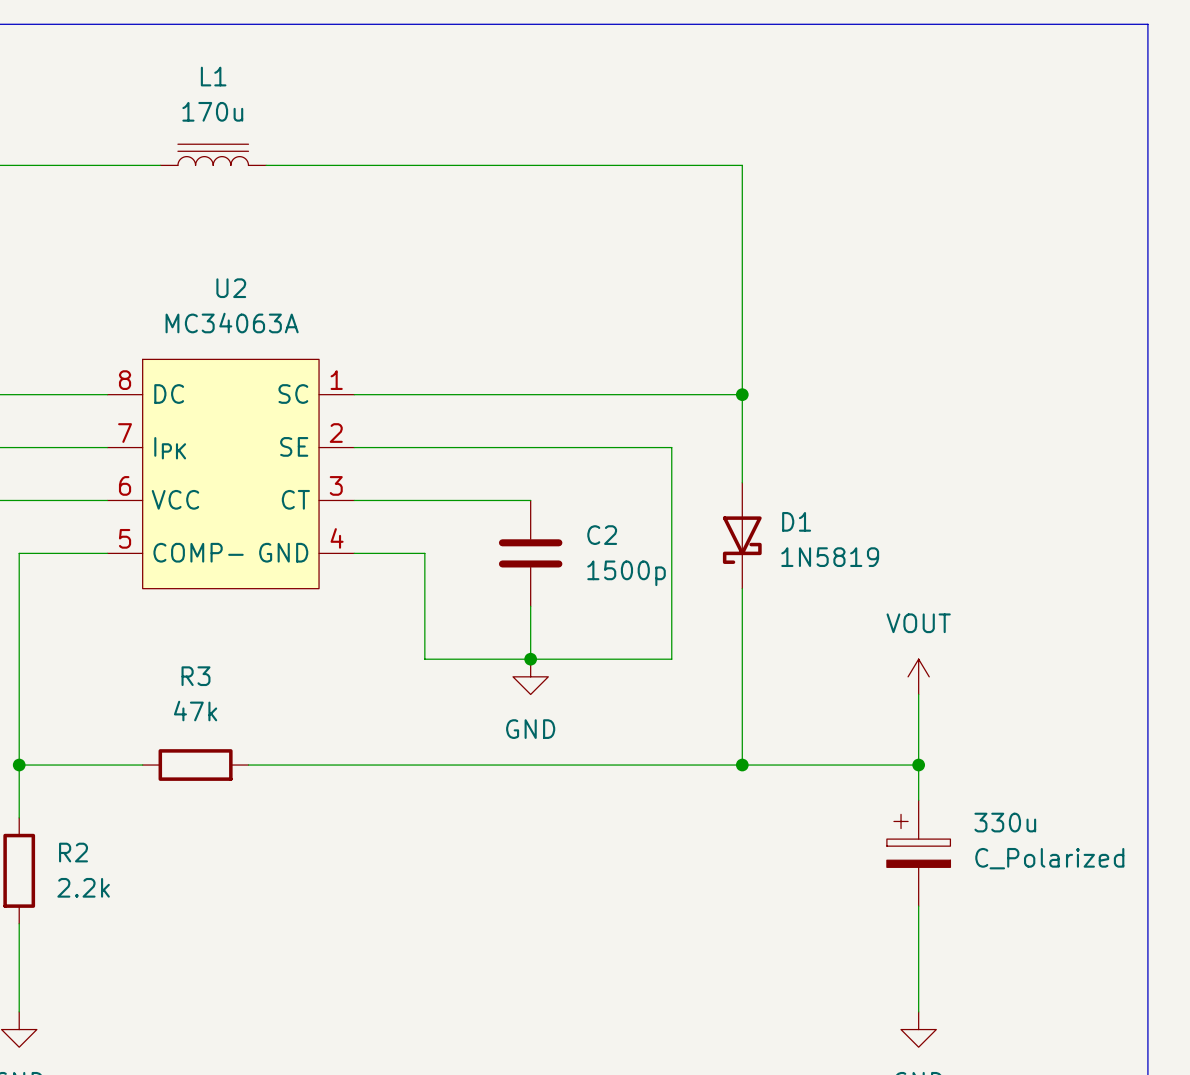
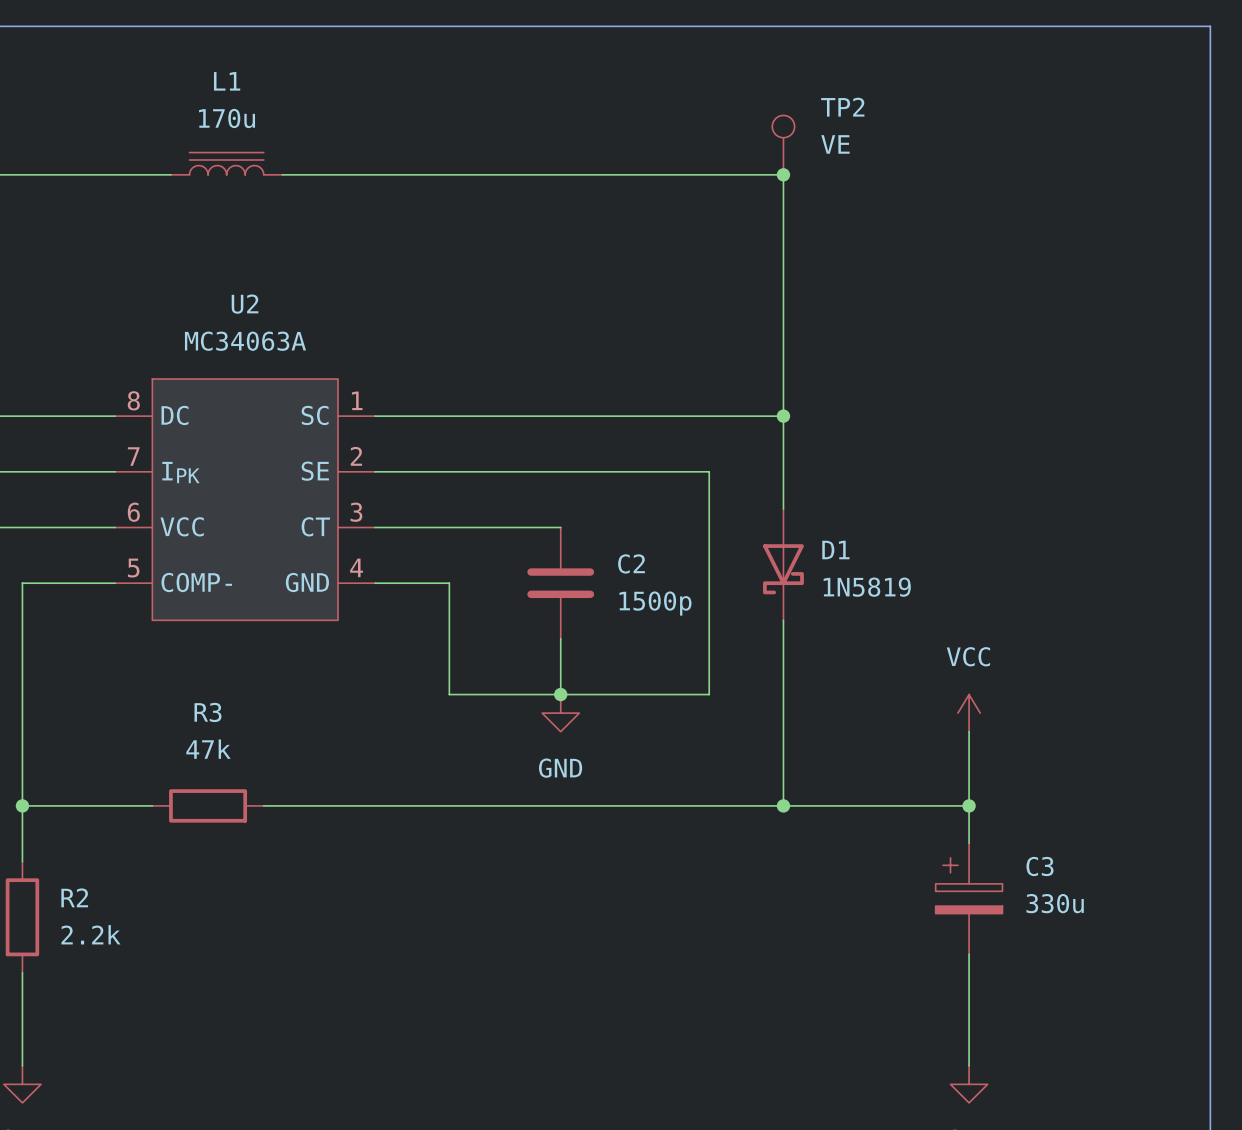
TP2: none -> VE (783, 145)
junction: none -> (783, 174)
power symbol: VOUT (918, 676) -> VCC (969, 713)
330u name: 330u (1005, 822) -> C3 (1039, 866)
330u value: C_Polarized (1049, 858) -> 330u (1055, 903)

